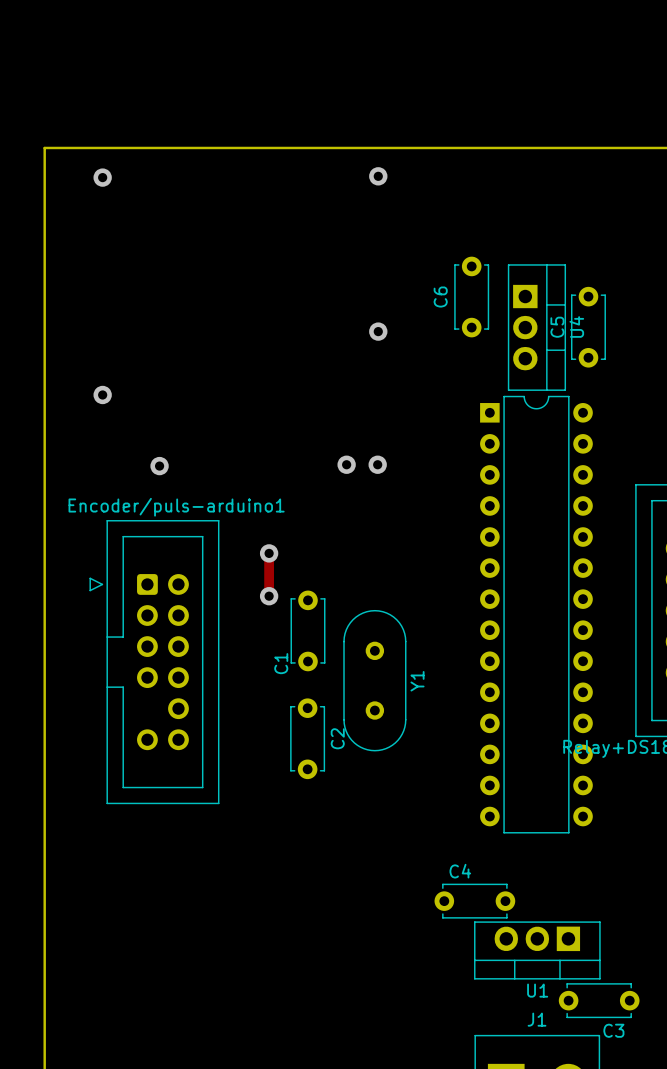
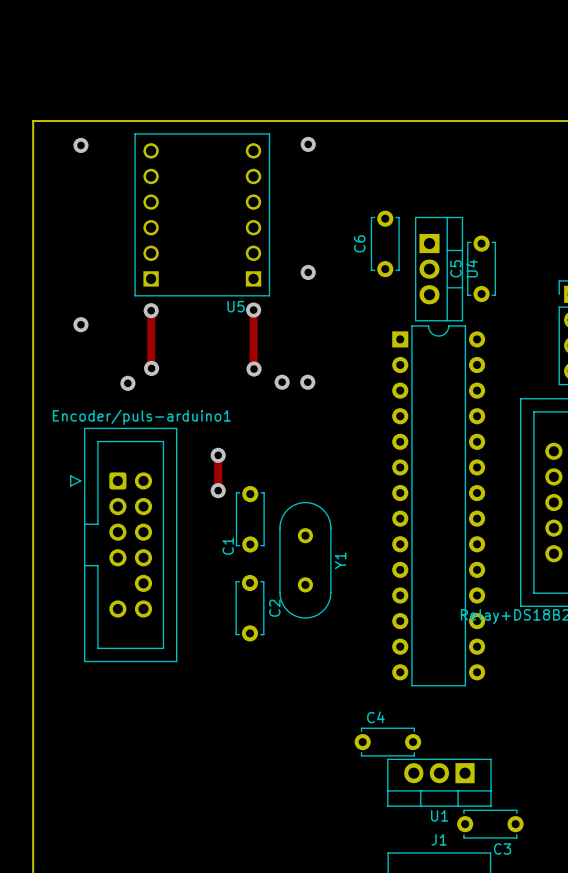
U5: none -> (202, 214)
track: none -> (151, 310) (151, 368)
via: none -> (151, 310)
track: none -> (253, 310) (254, 369)
via: none -> (253, 310)
via: none -> (151, 368)
via: none -> (254, 369)

